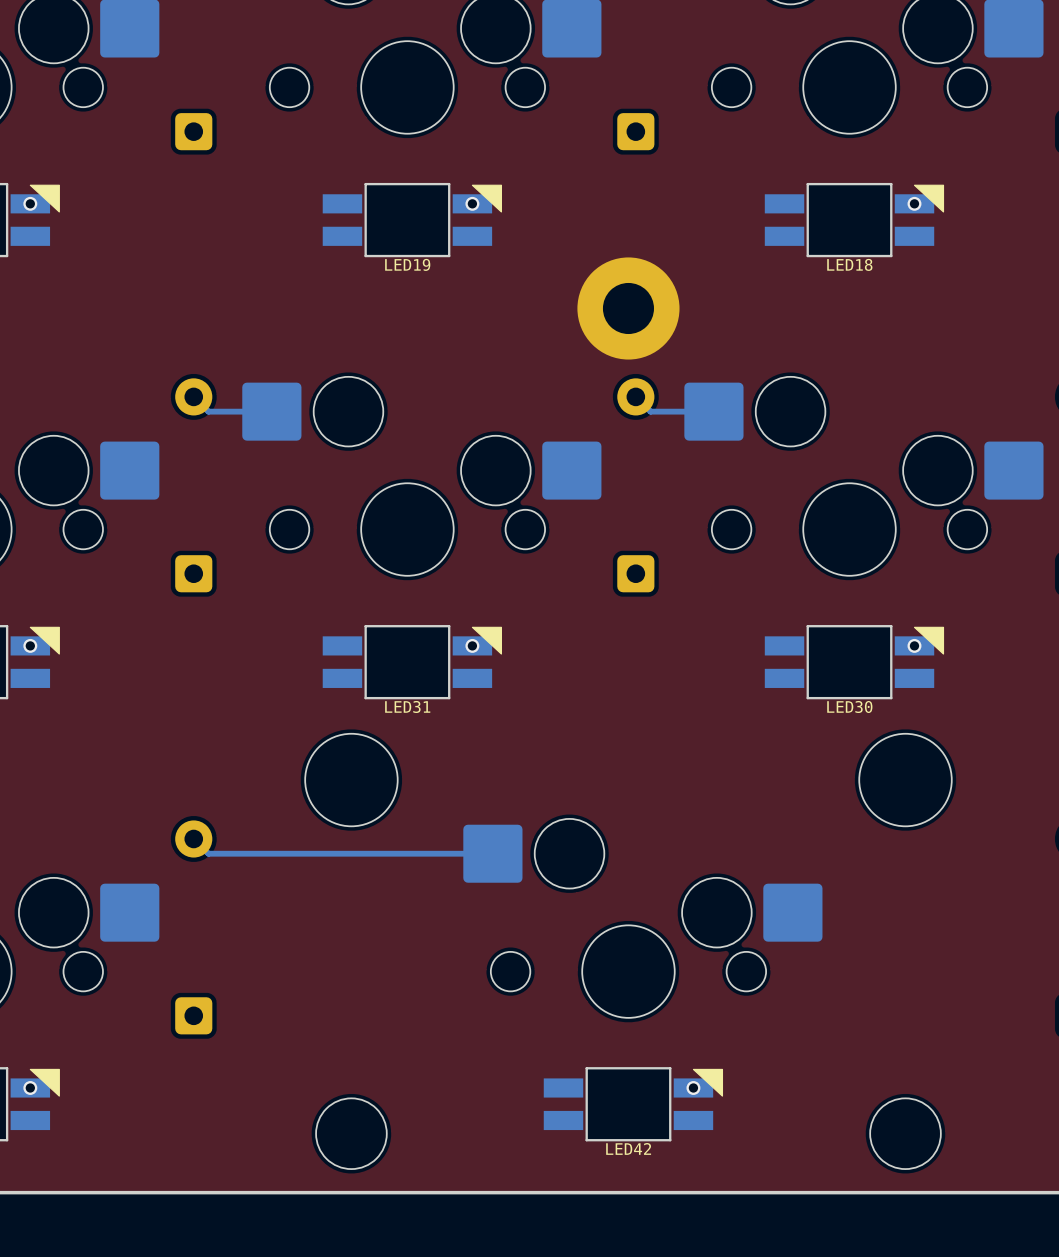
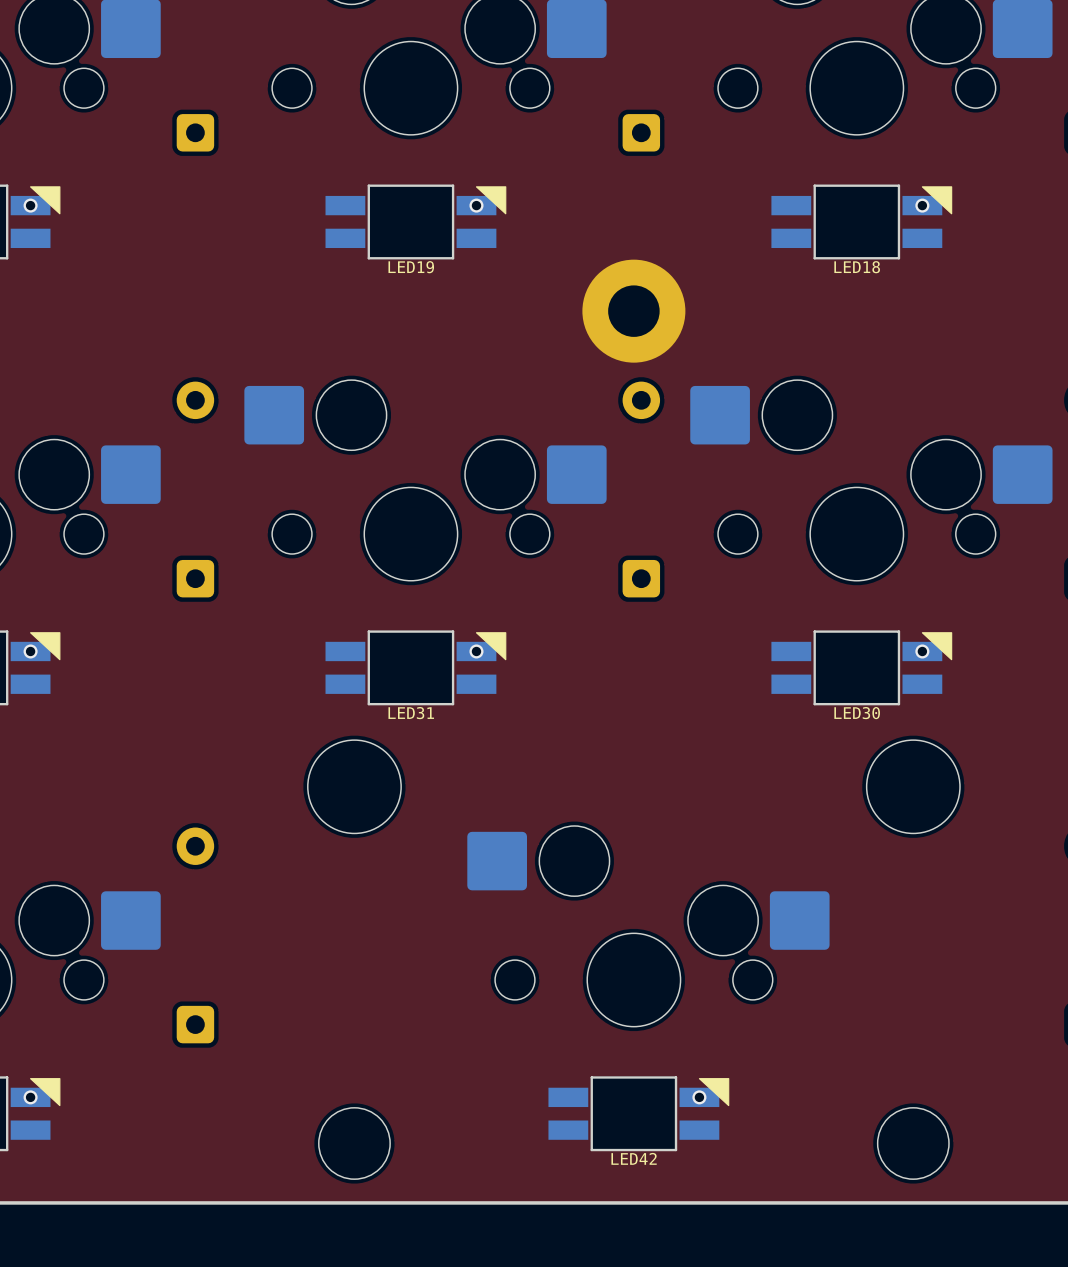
bottom track: (193, 396) (208, 411) (271, 411) -> none
bottom track: (635, 396) (650, 411) (713, 411) -> none
bottom track: (193, 838) (208, 853) (492, 853) -> none

